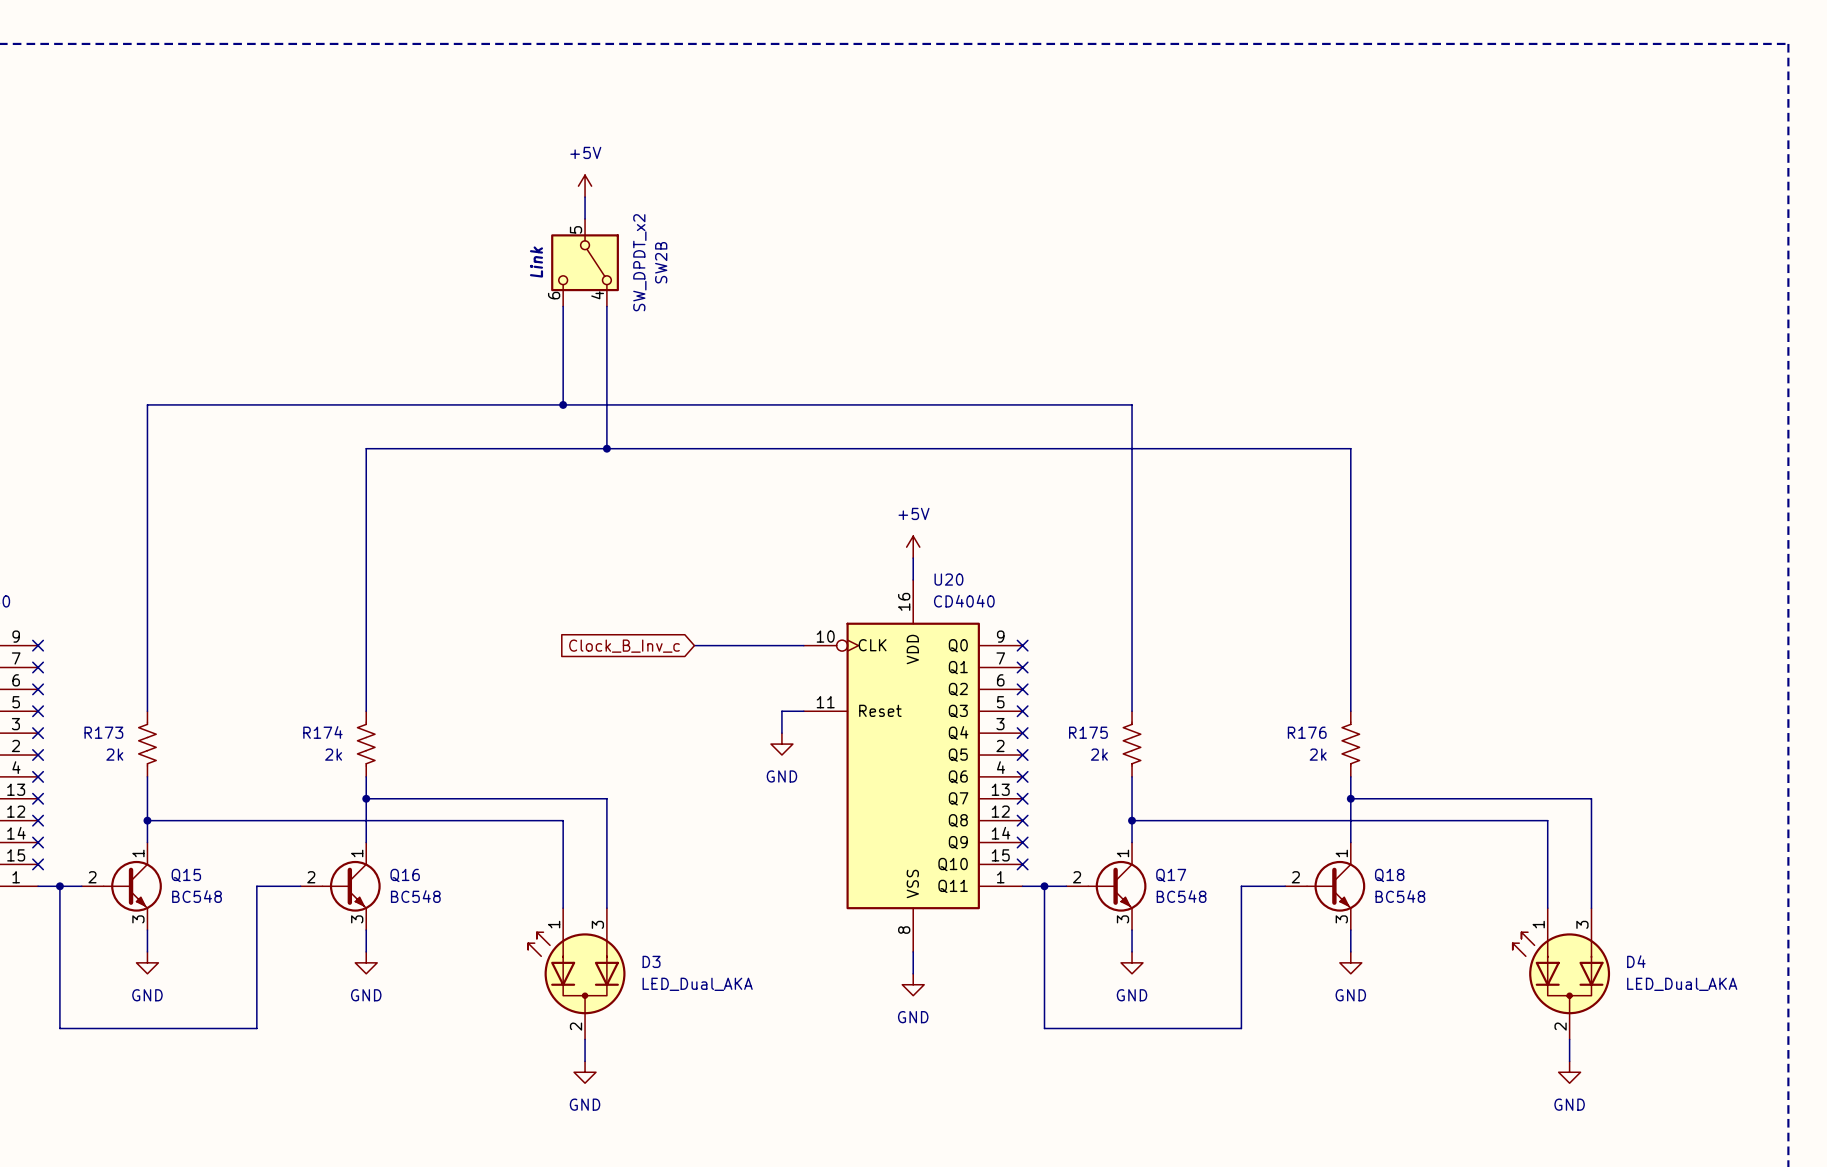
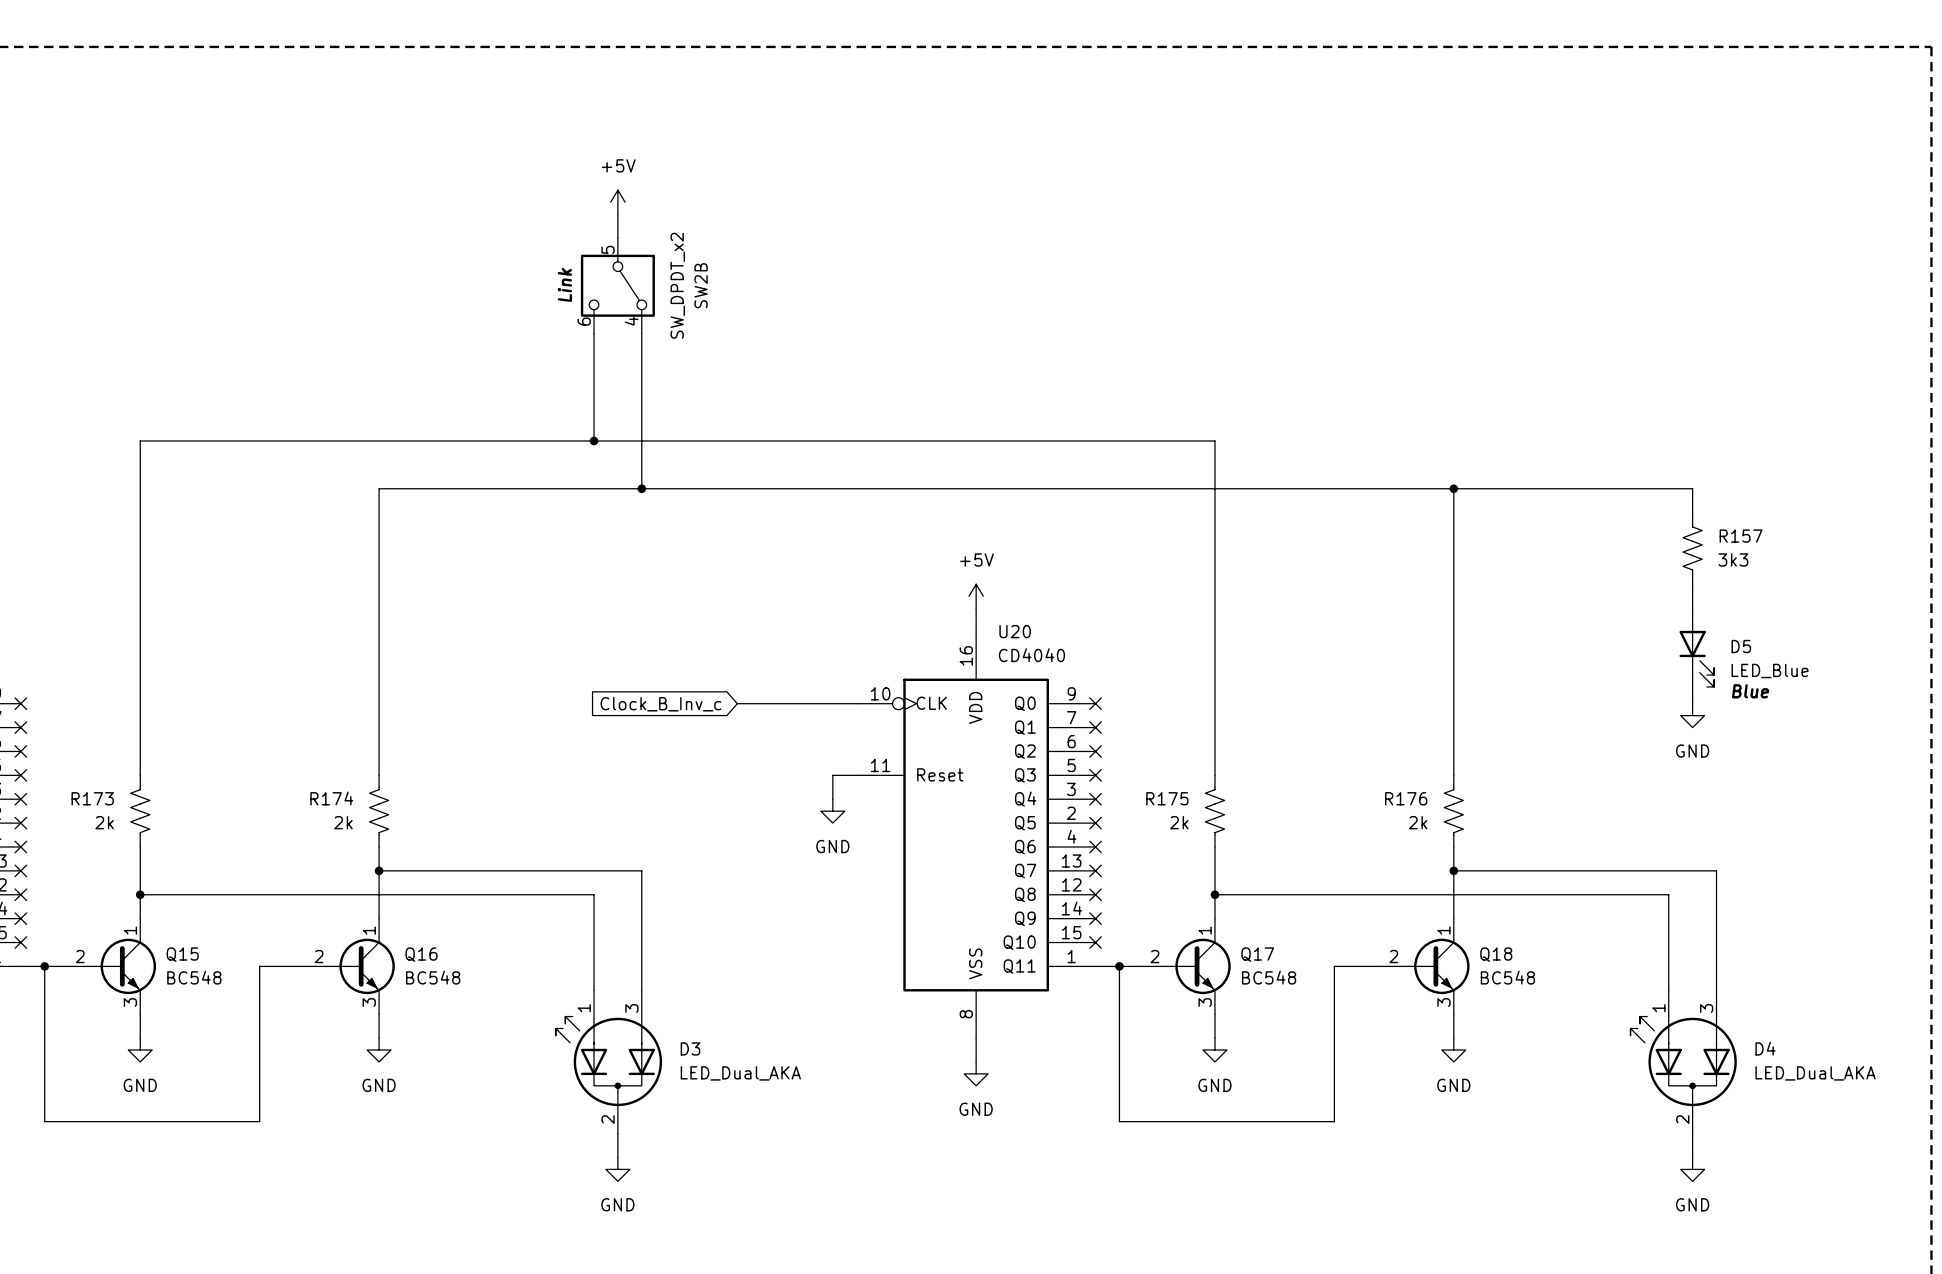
wire: none -> (1453, 488) (1692, 488) (1692, 512)
junction: none -> (1453, 488)
R157: none -> 3k3 (1692, 548)
wire: none -> (1692, 584) (1692, 608)
D5: none -> LED_Blue (1696, 647)
wire: none -> (1692, 679) (1692, 703)
power symbol: none -> GND (1692, 715)

